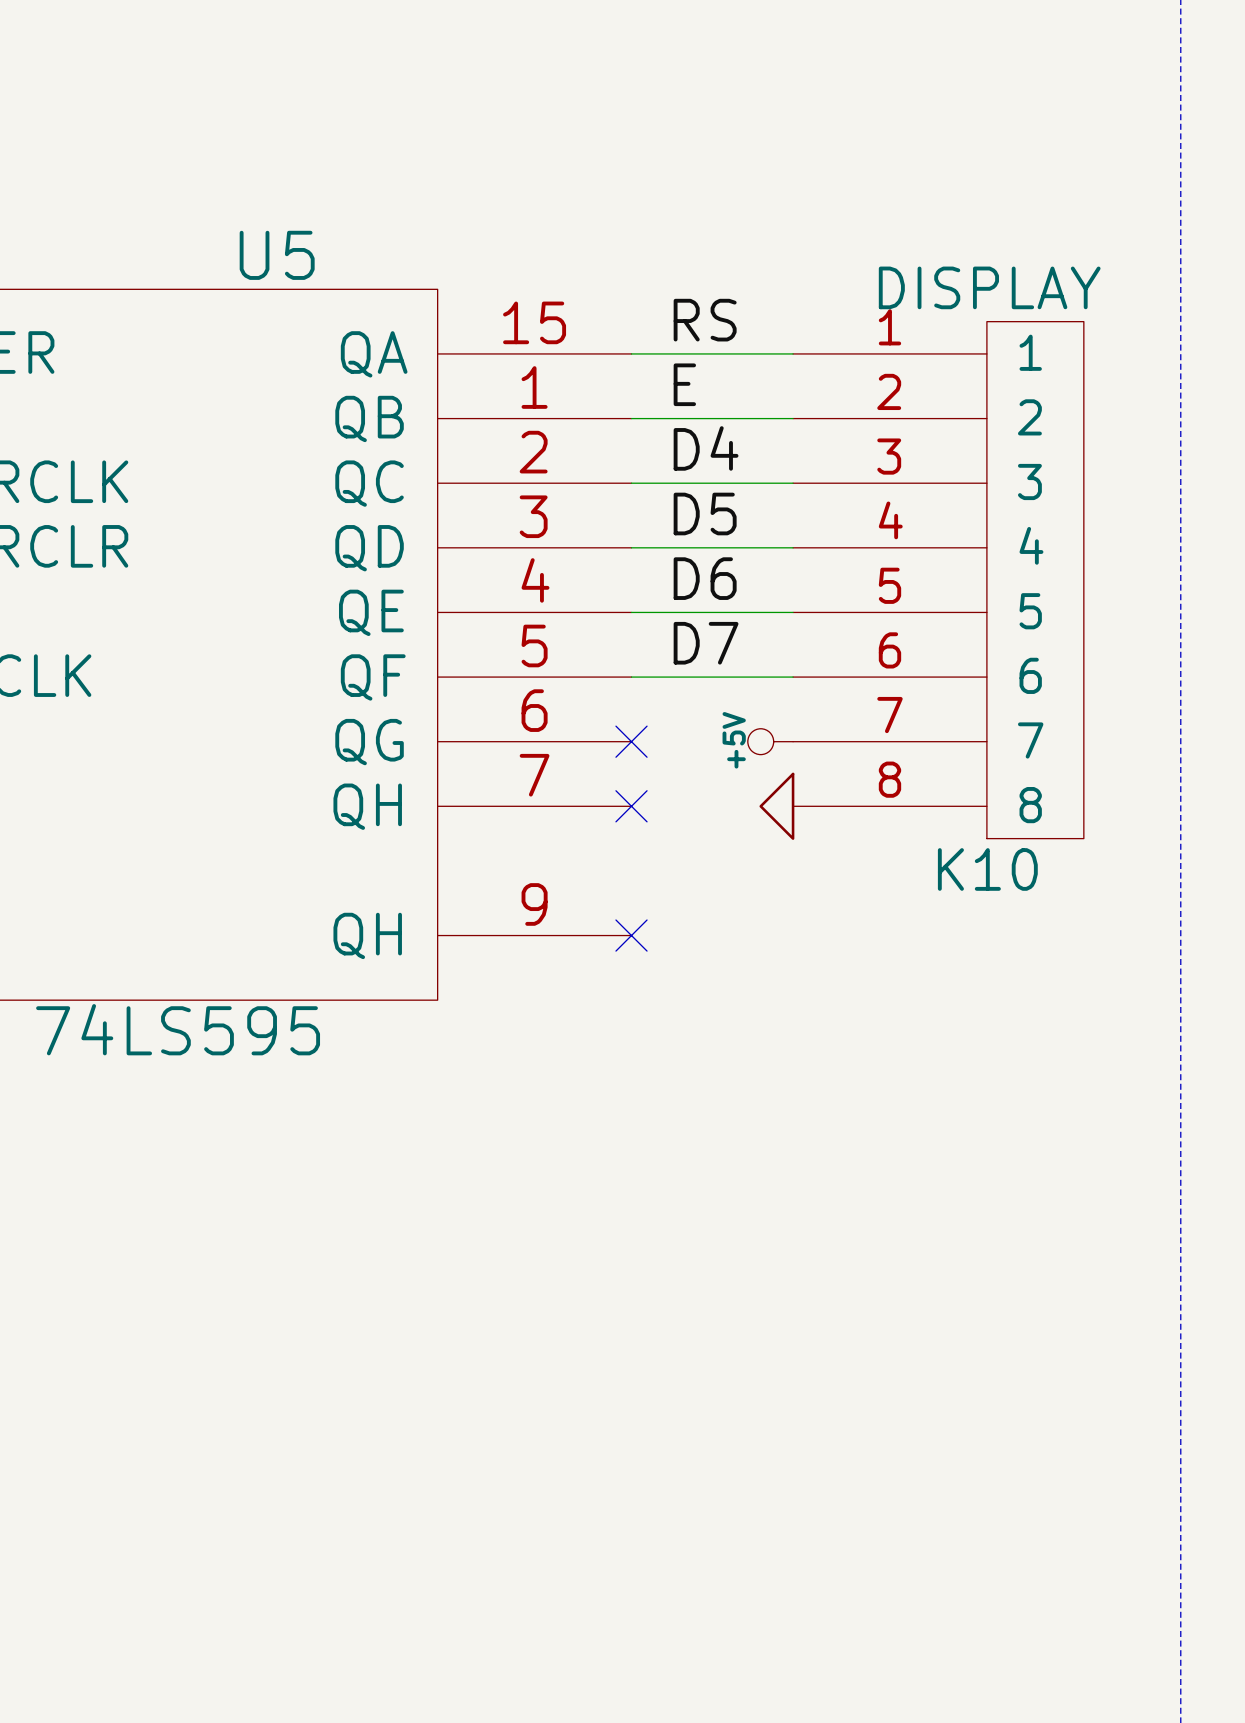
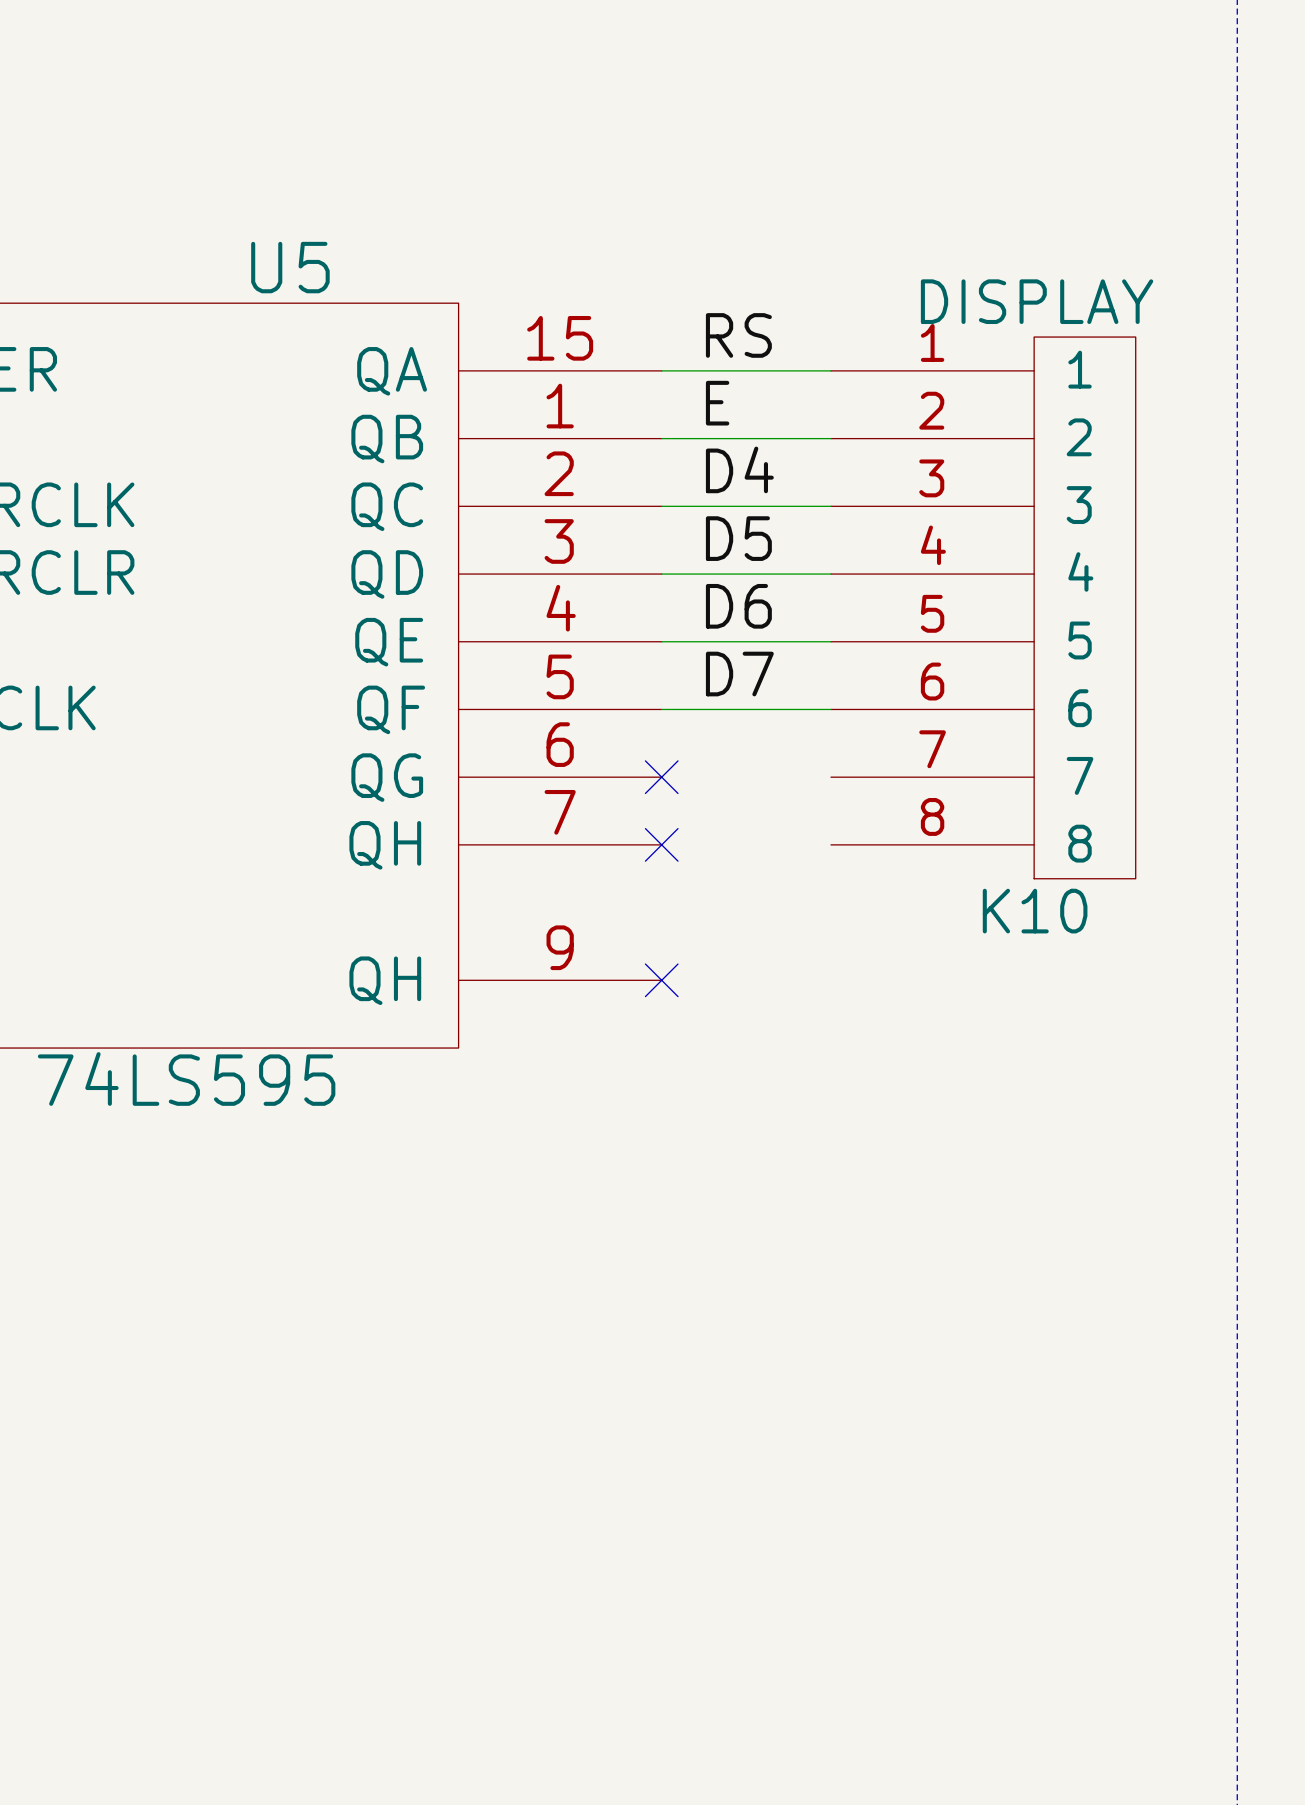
power symbol: +5V (770, 741) -> none
power symbol: (776, 806) -> none

